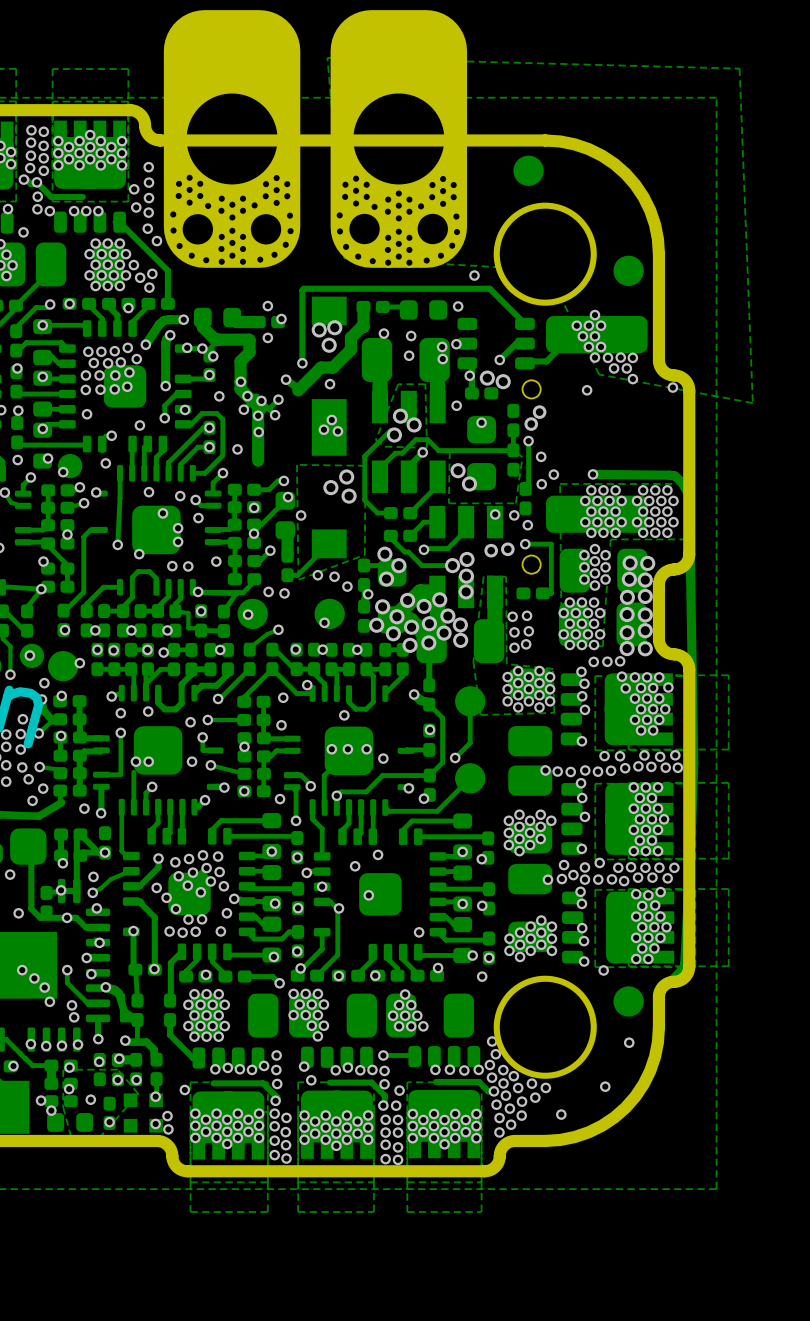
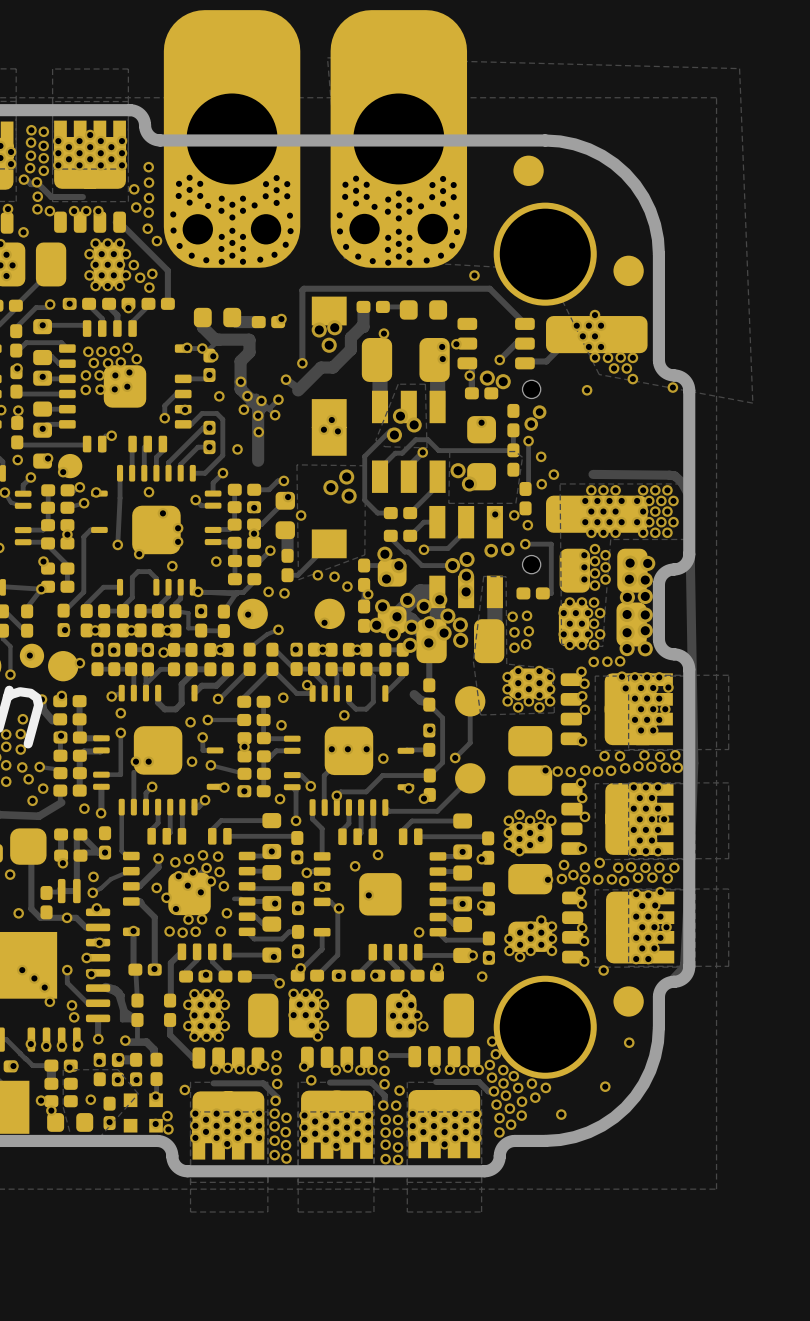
via: (267, 306) -> none
via: (458, 306) -> none
track: (183, 319) (164, 320) (145, 344) -> none
via: (183, 319) -> none
track: (170, 335) (165, 343) (165, 386) -> none
via: (170, 335) -> none
via: (411, 336) -> none
via: (267, 337) -> none
via: (145, 344) -> none
via: (409, 355) -> none
via: (329, 384) -> none
via: (165, 386) -> none
via: (456, 405) -> none
via: (87, 414) -> none
via: (139, 425) -> none
via: (105, 463) -> none
via: (593, 474) -> none
via: (180, 496) -> none
via: (198, 518) -> none
via: (188, 566) -> none
via: (44, 683) -> none
via: (414, 694) -> none
via: (148, 711) -> none
track: (51, 721) (38, 733) -> none
via: (38, 733) -> none
via: (61, 890) -> none
via: (234, 898) -> none
via: (105, 987) -> none
via: (69, 1089) -> none

